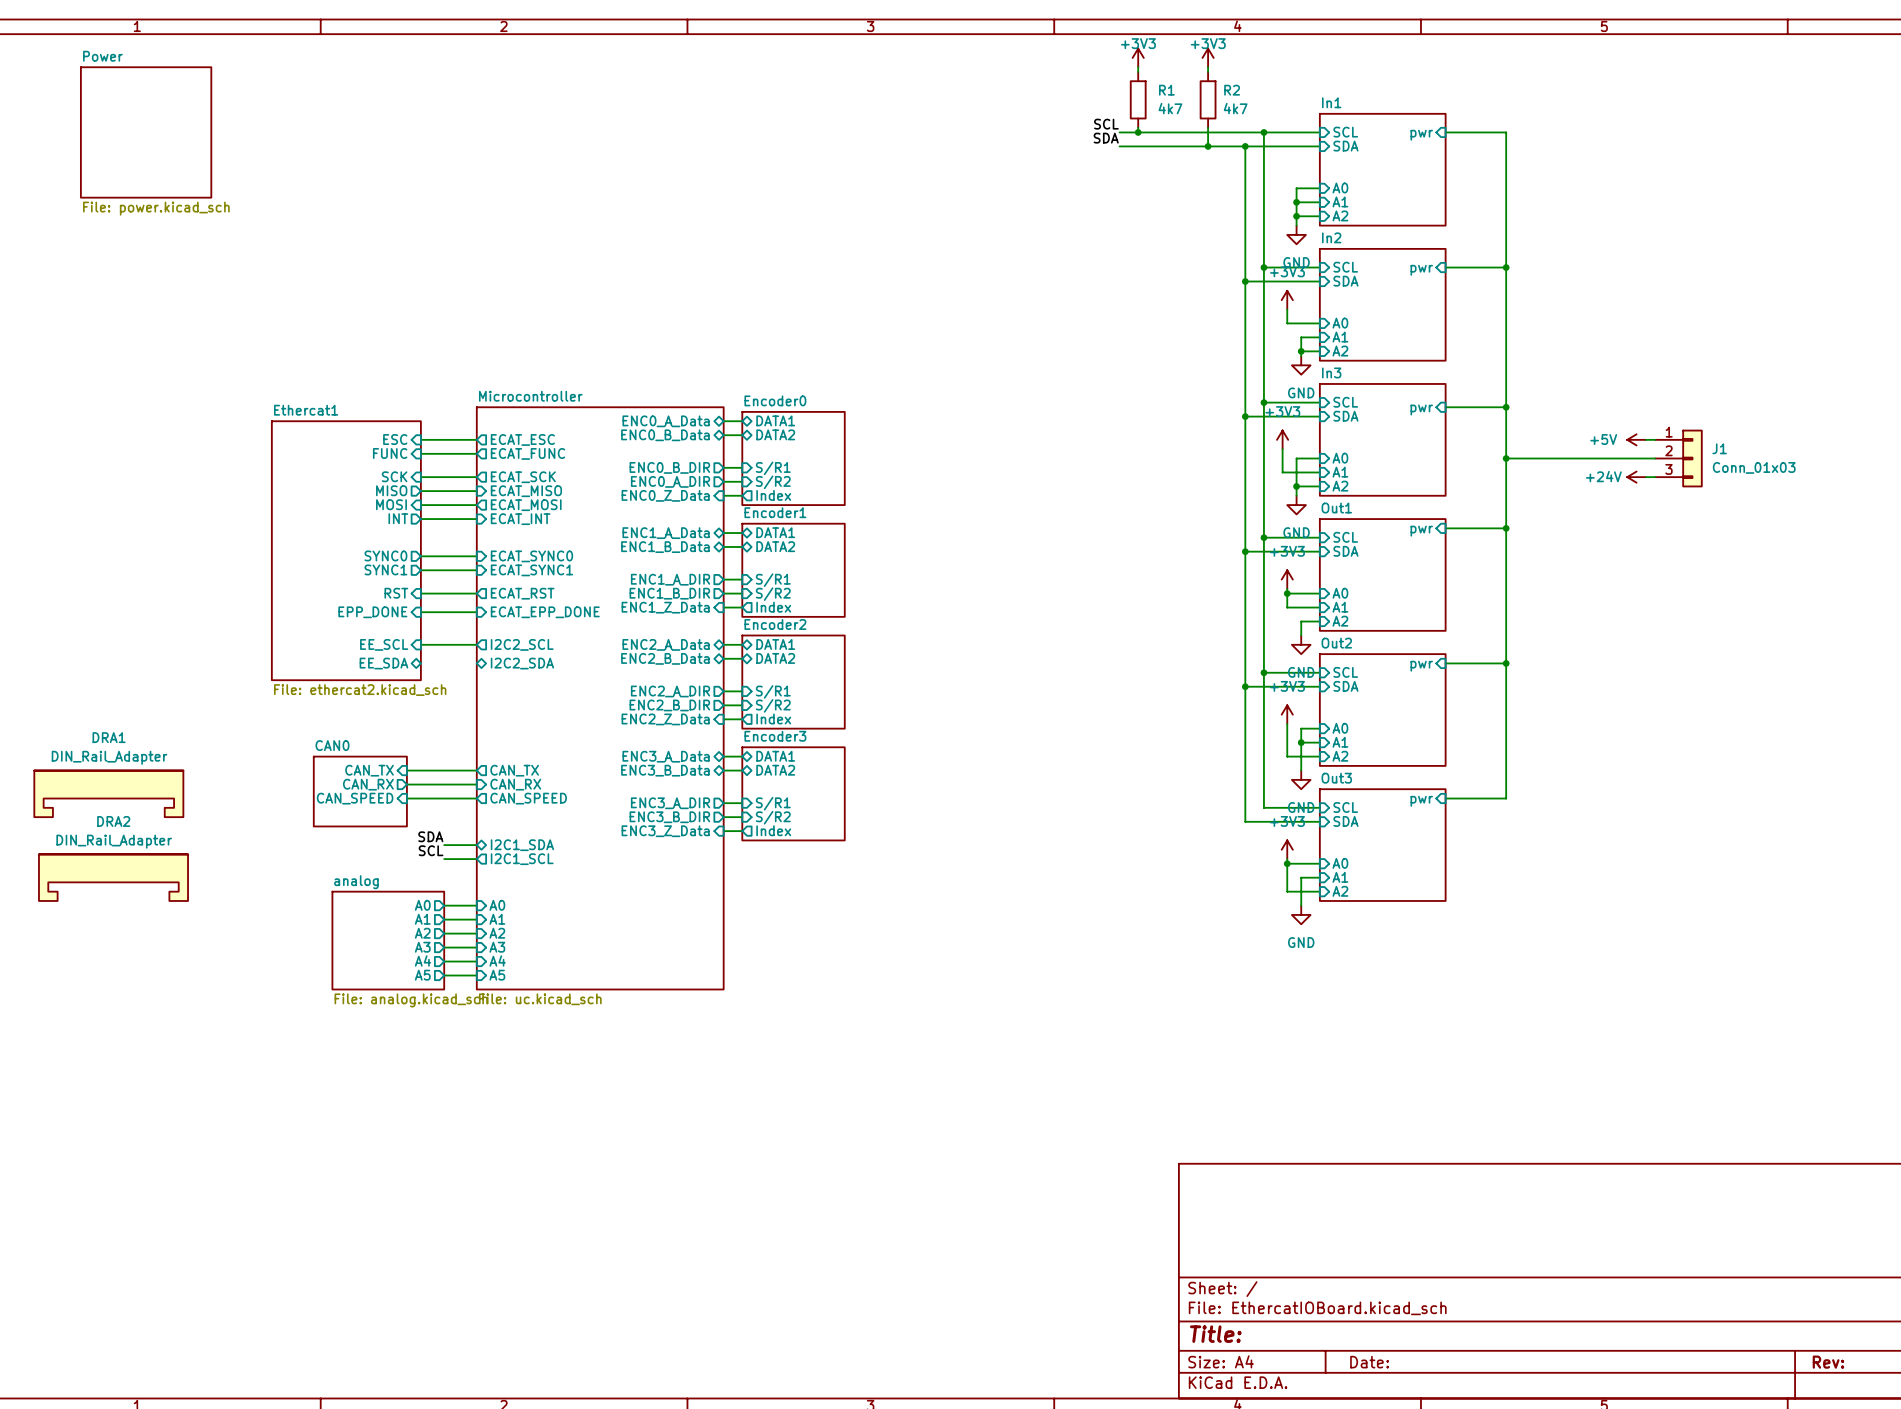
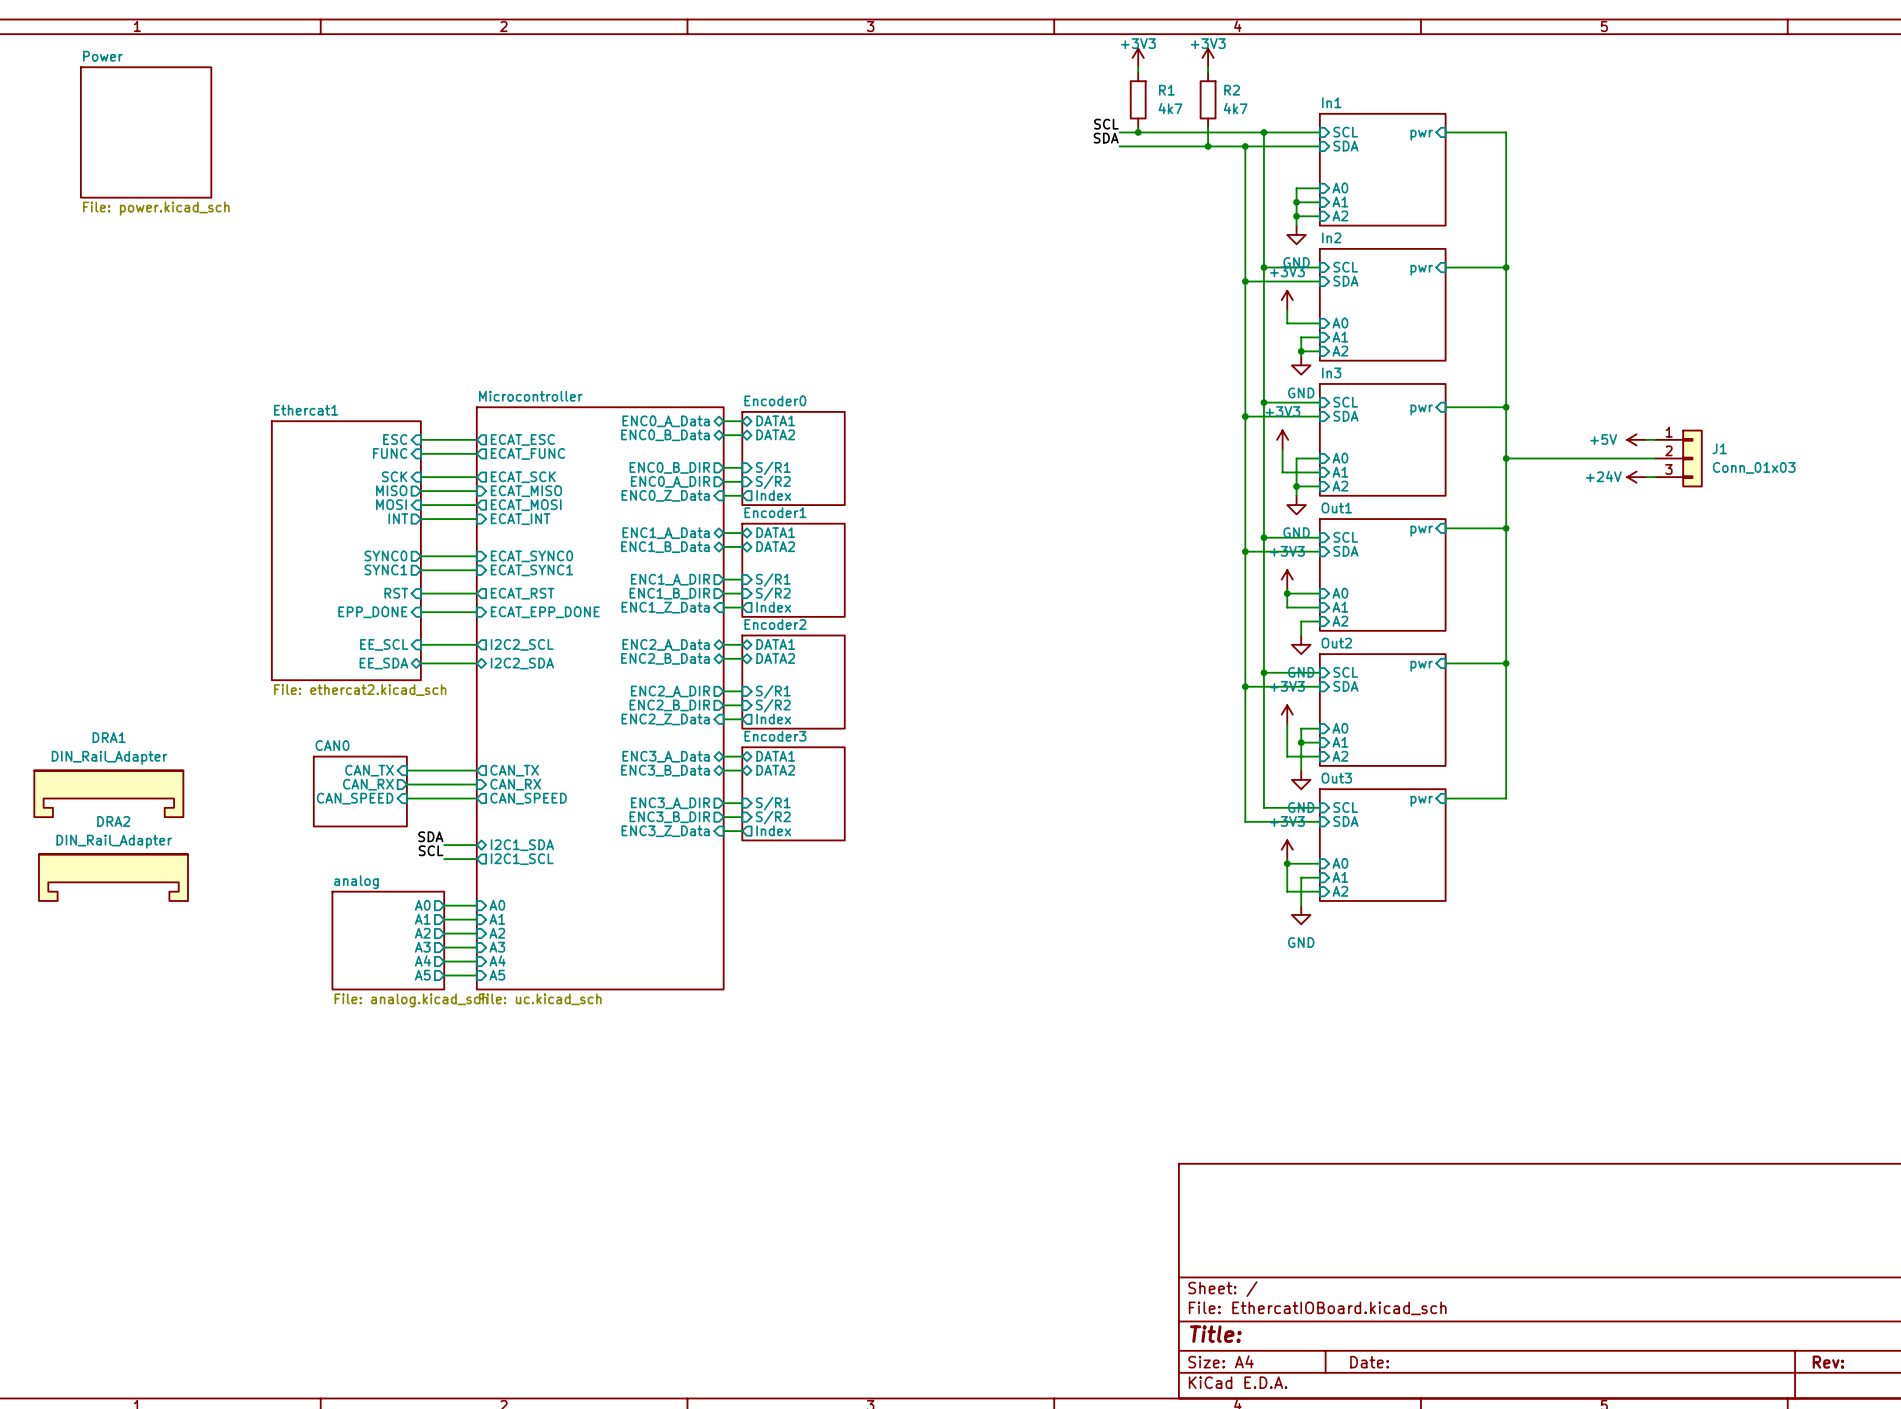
wire: none -> (420, 663) (476, 663)

